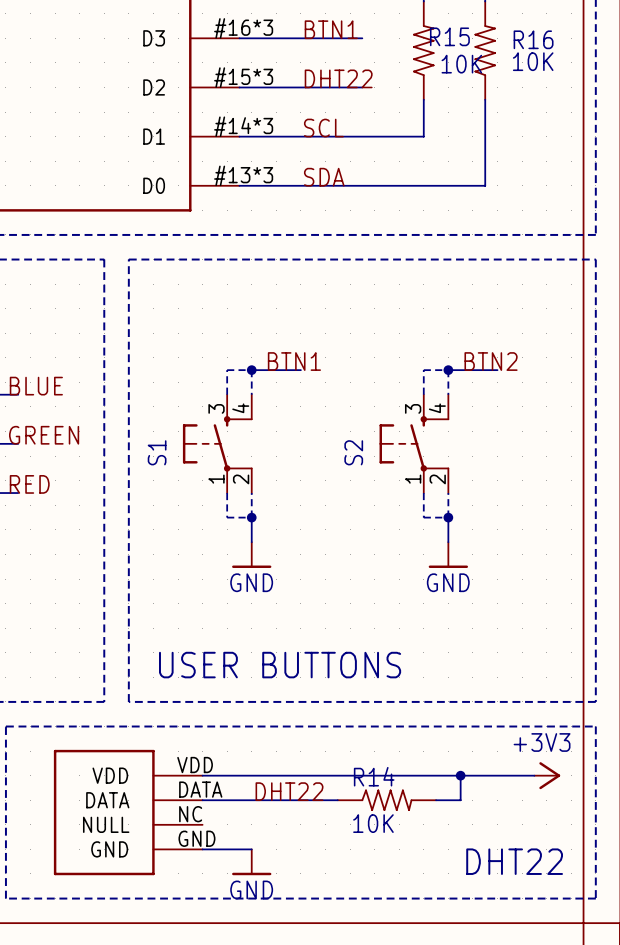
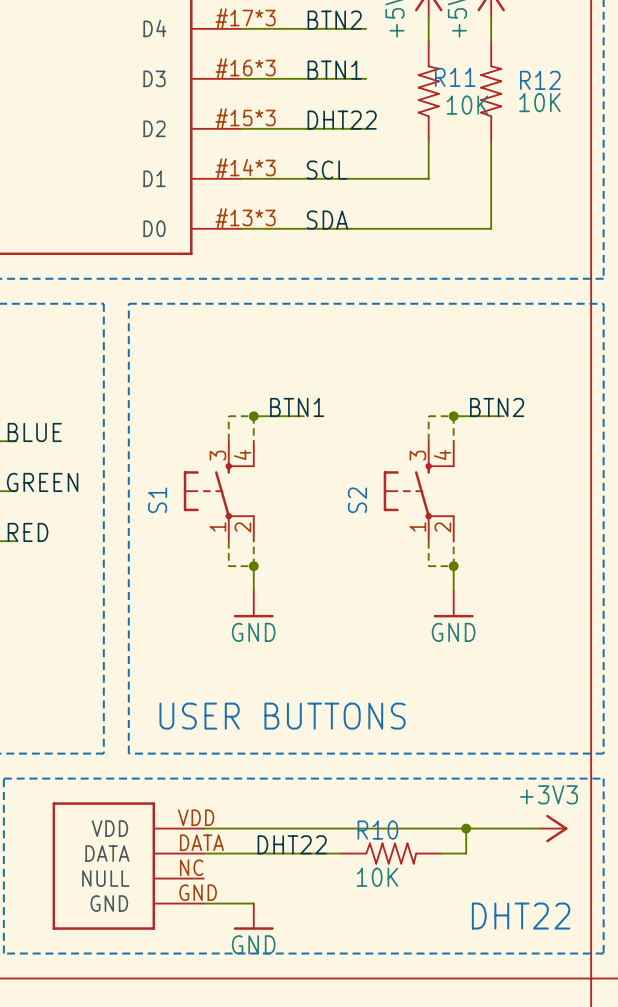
R15 name: R15 (449, 36) -> R11 (455, 77)
R16 name: R16 (533, 39) -> R12 (540, 80)
R14 name: R14 (374, 776) -> R10 (377, 830)

